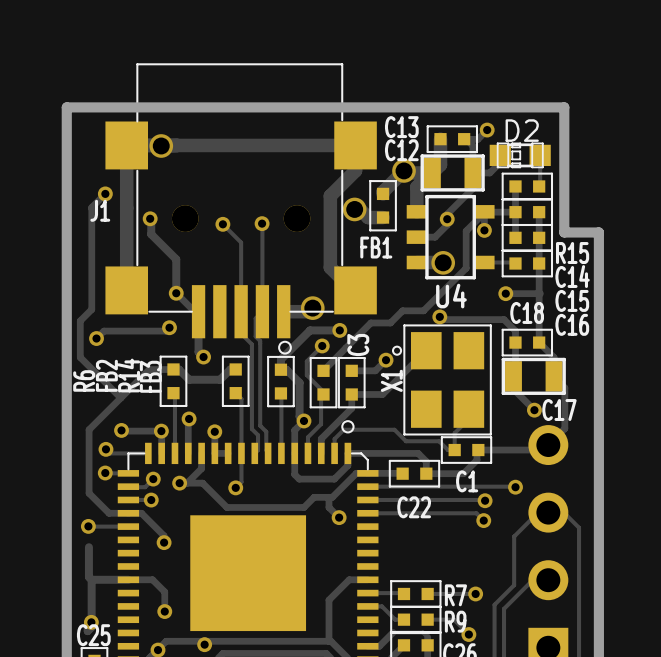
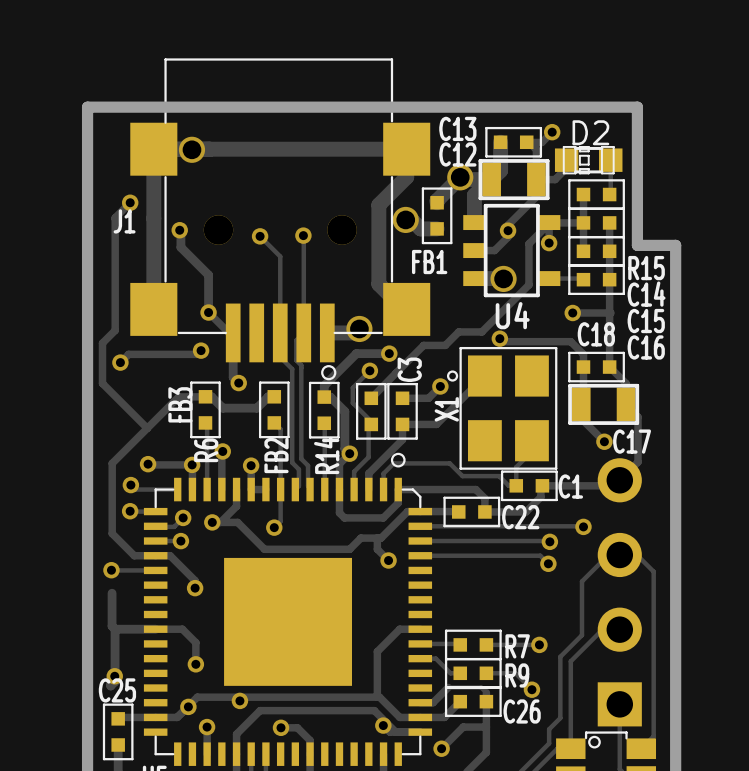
FB2 name position: FB2 (106, 375) -> FB2 (276, 455)
R14 name position: R14 (128, 375) -> R14 (326, 455)
R6 name position: R6 (84, 380) -> R6 (206, 450)
C1 name position: C1 (467, 481) -> C1 (570, 486)
C22 name position: C22 (414, 507) -> C22 (520, 517)

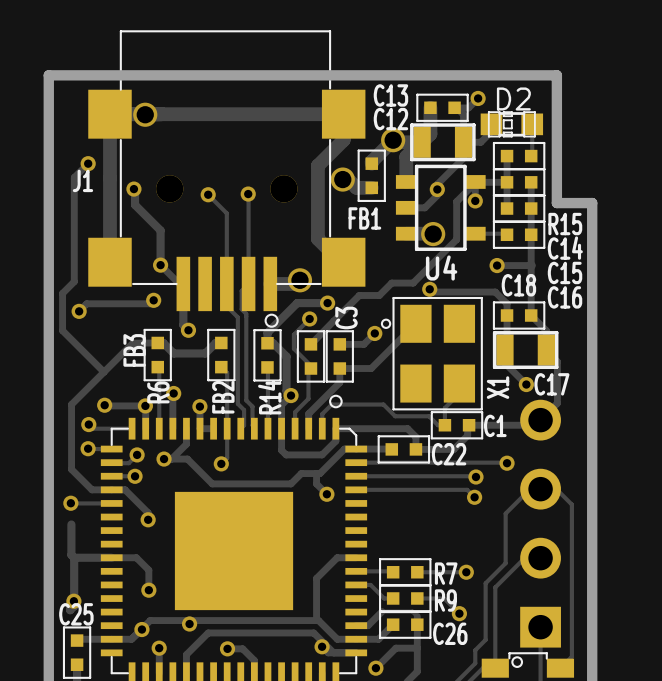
X1 name position: X1 (446, 409) -> X1 (498, 387)

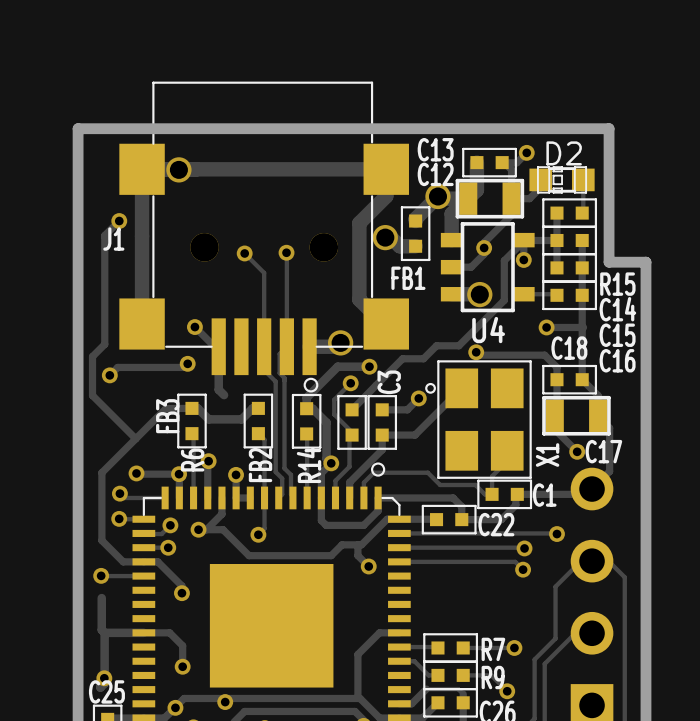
track: (133, 189) (135, 204) (160, 230) (160, 265) -> none
via: (133, 189) -> none
via: (188, 330) -> none

